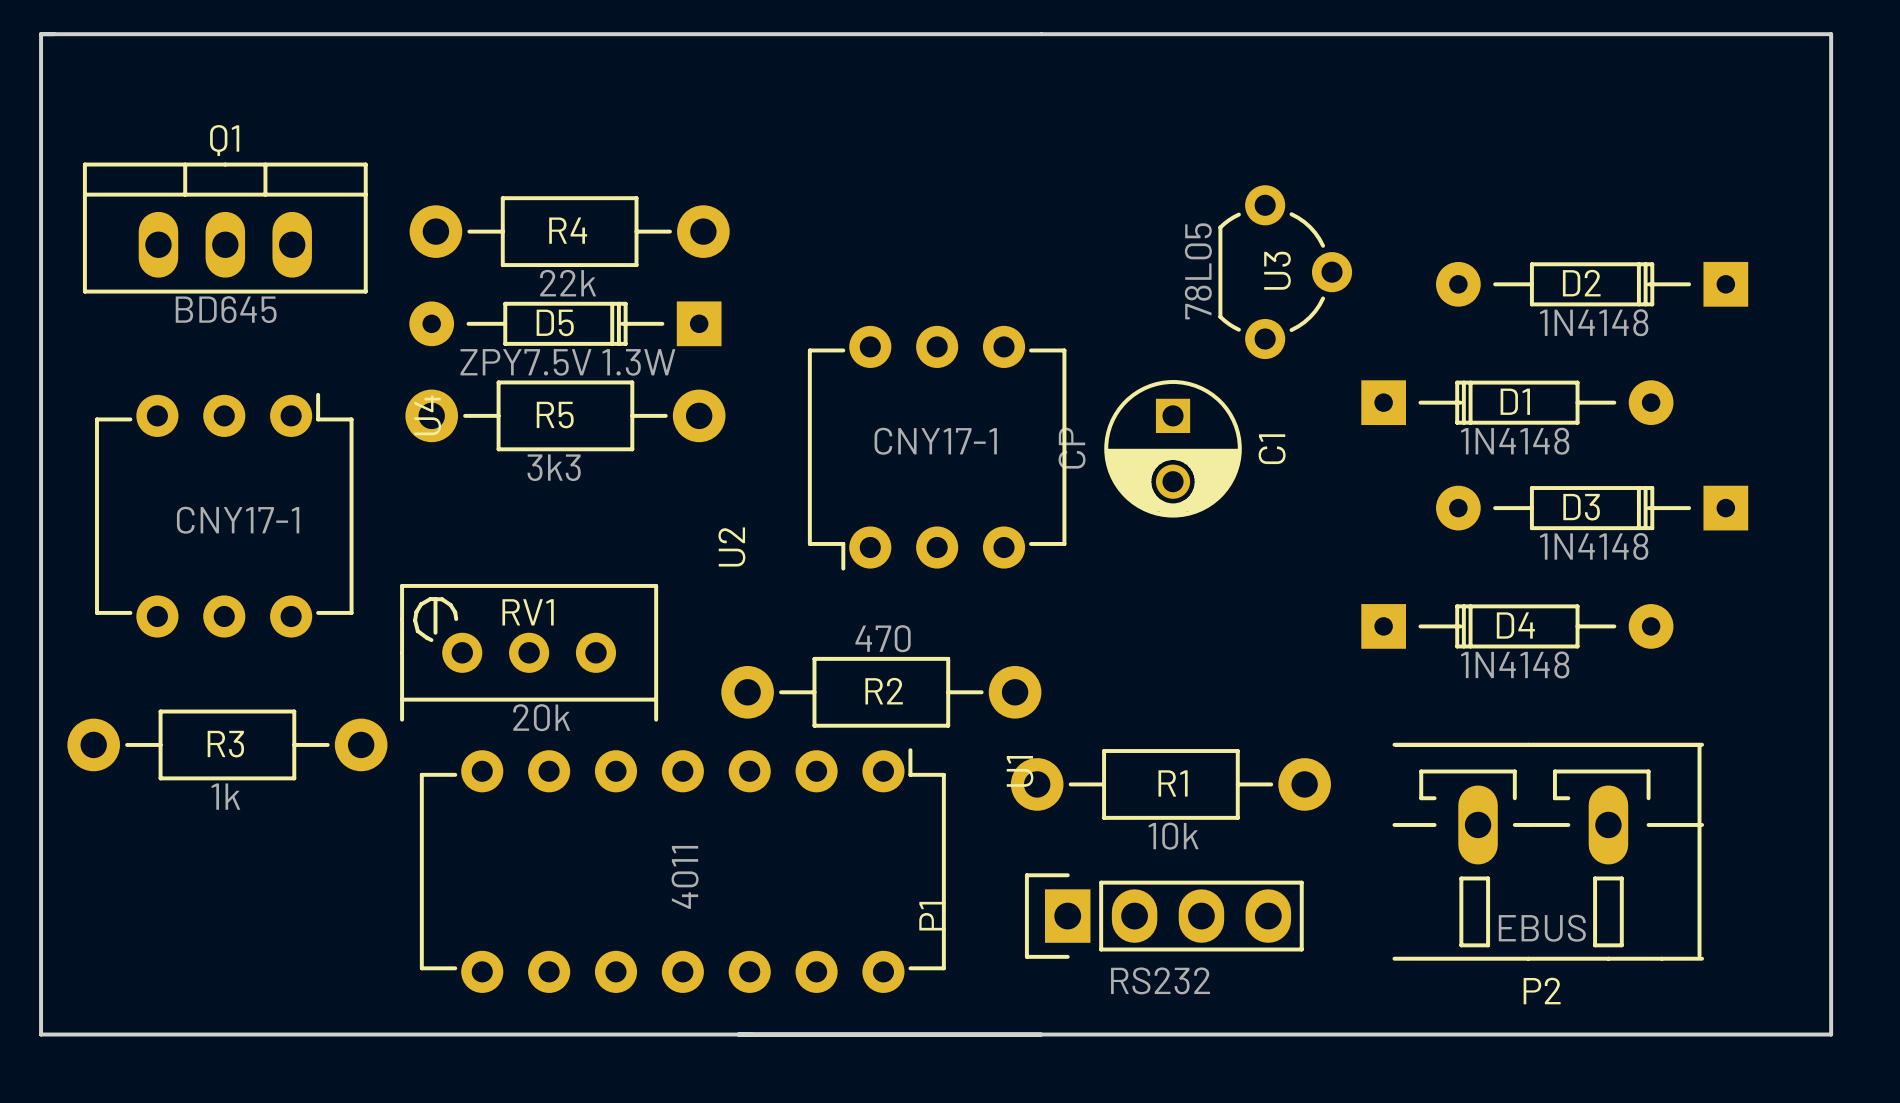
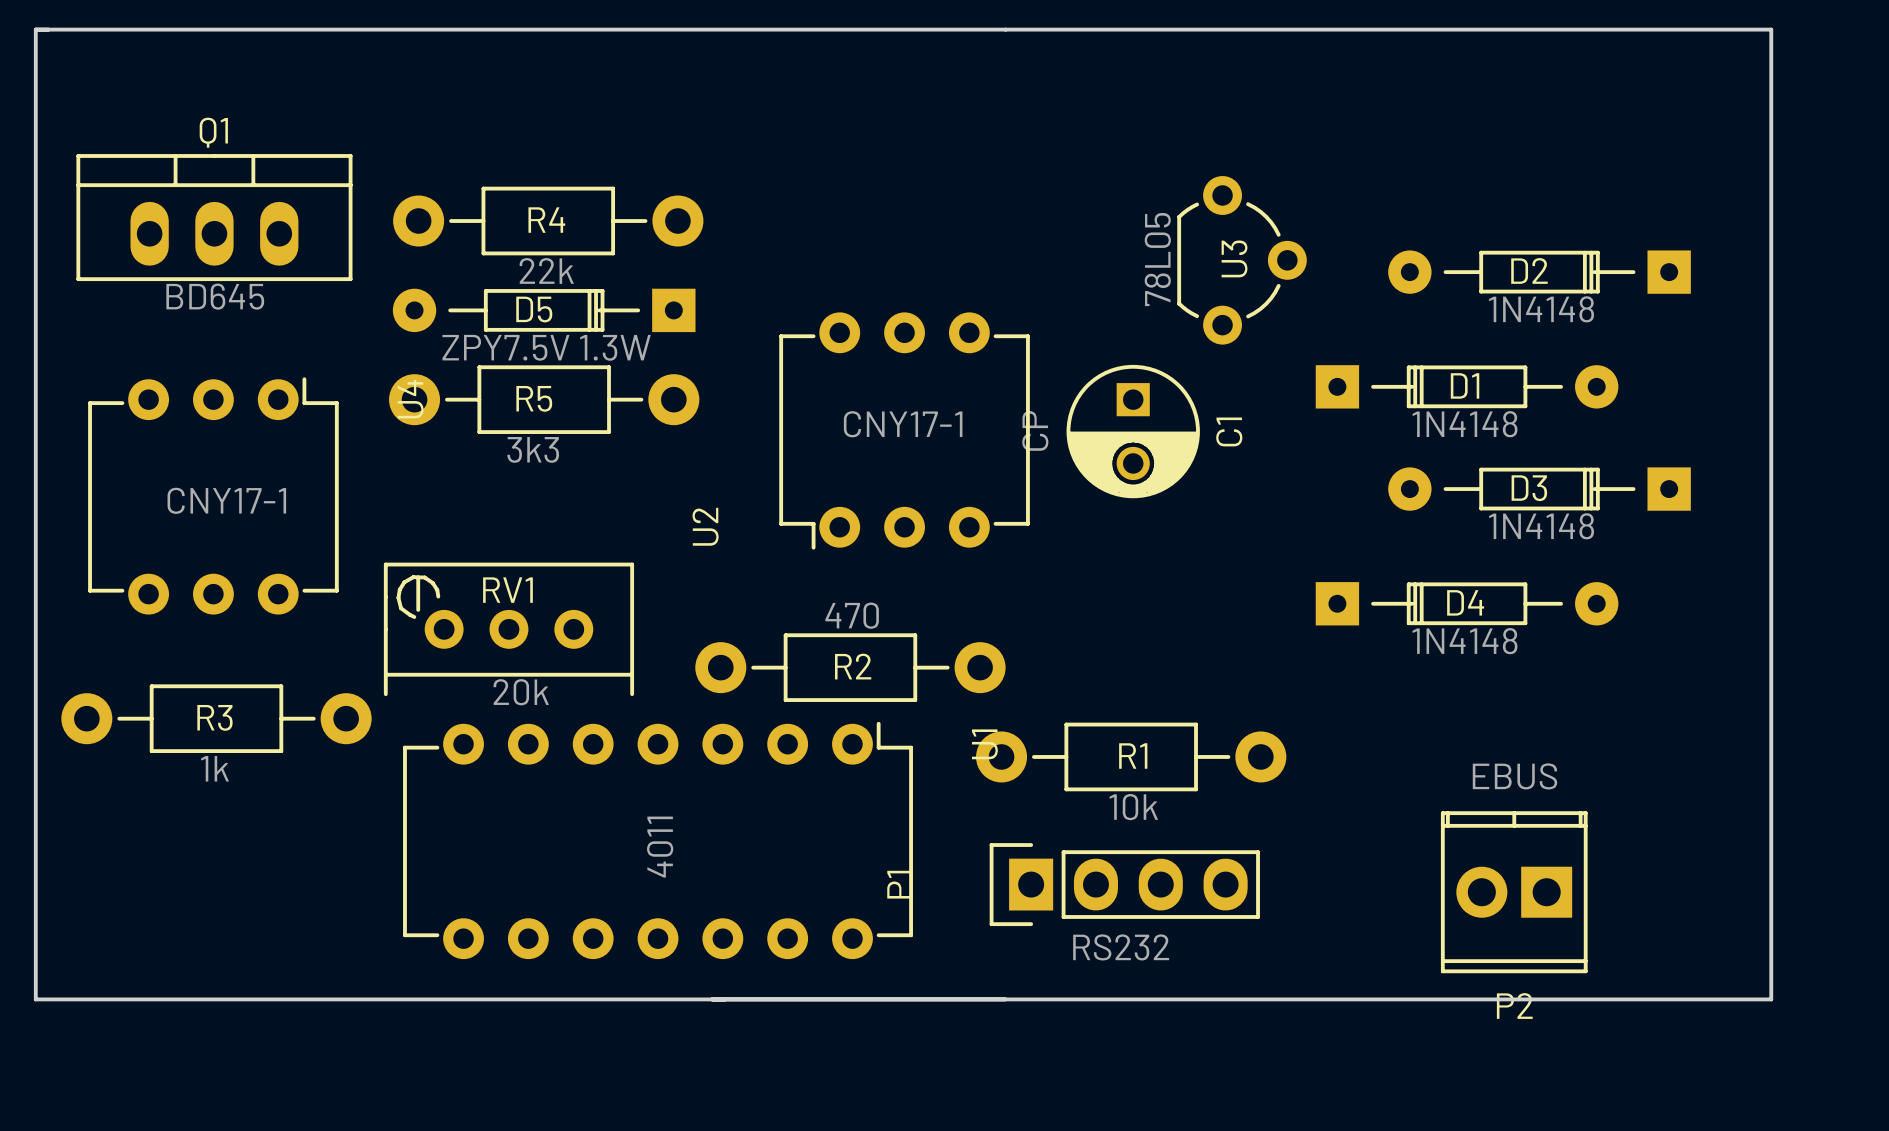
P2 footprint: [1392, 742, 1705, 961] -> [1440, 811, 1588, 974]
P2 value position: EBUS (1542, 928) -> EBUS (1514, 776)

